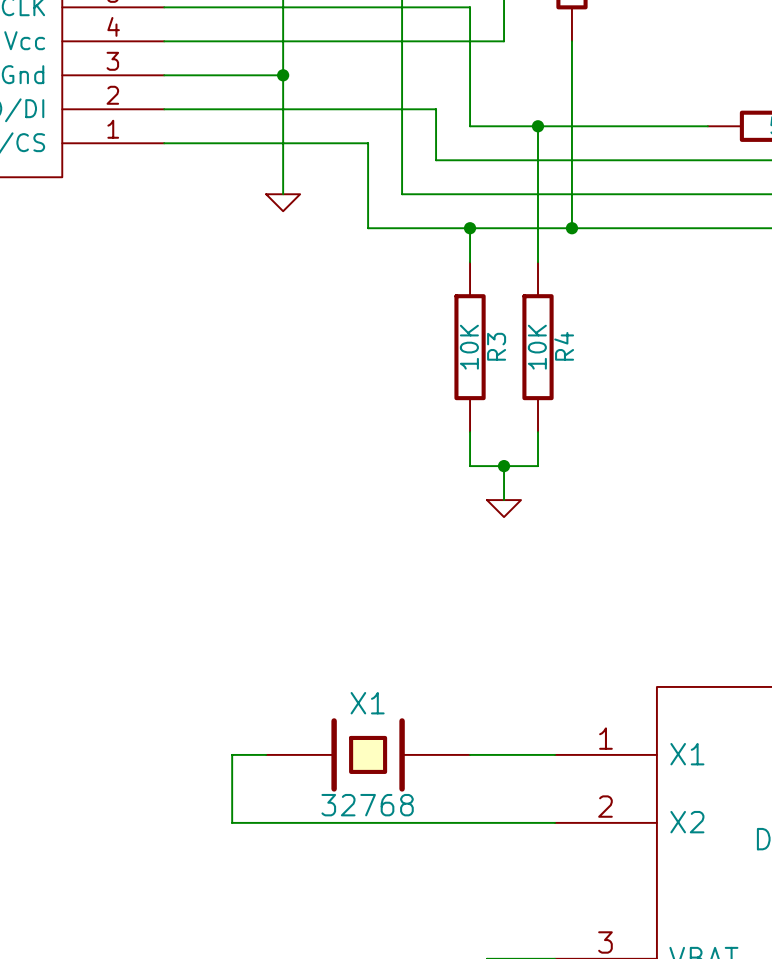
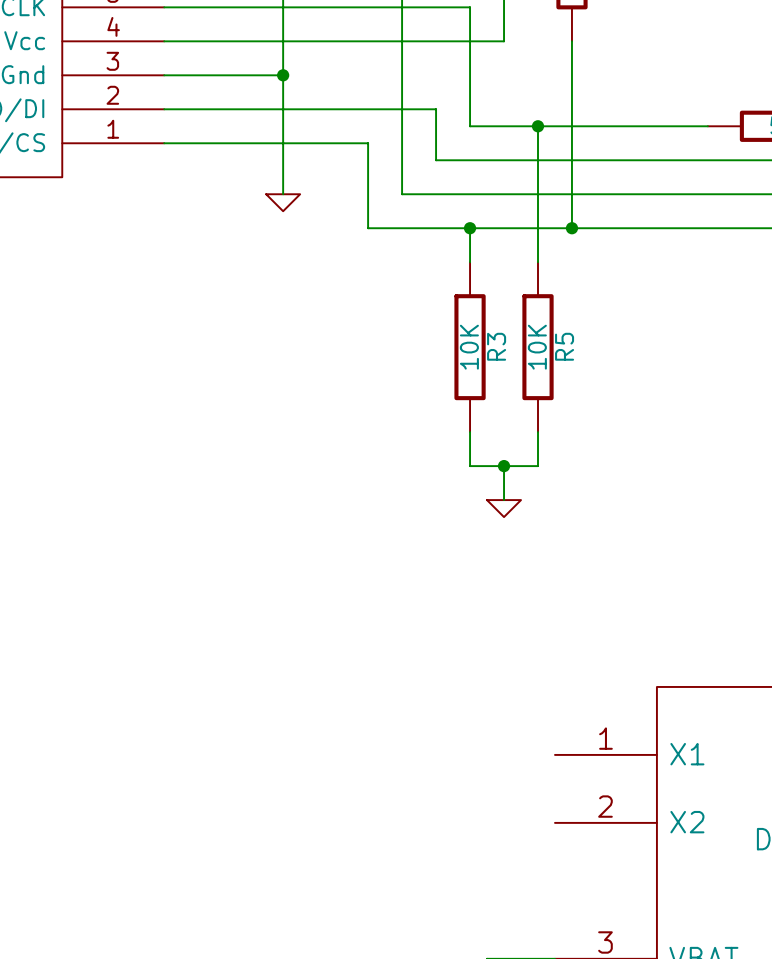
R4 name: R4 (564, 346) -> R5 (564, 346)
wire: (266, 754) (232, 754) (232, 822) (554, 822) -> none
X1: 32768 (368, 754) -> none
wire: (470, 754) (554, 754) -> none

